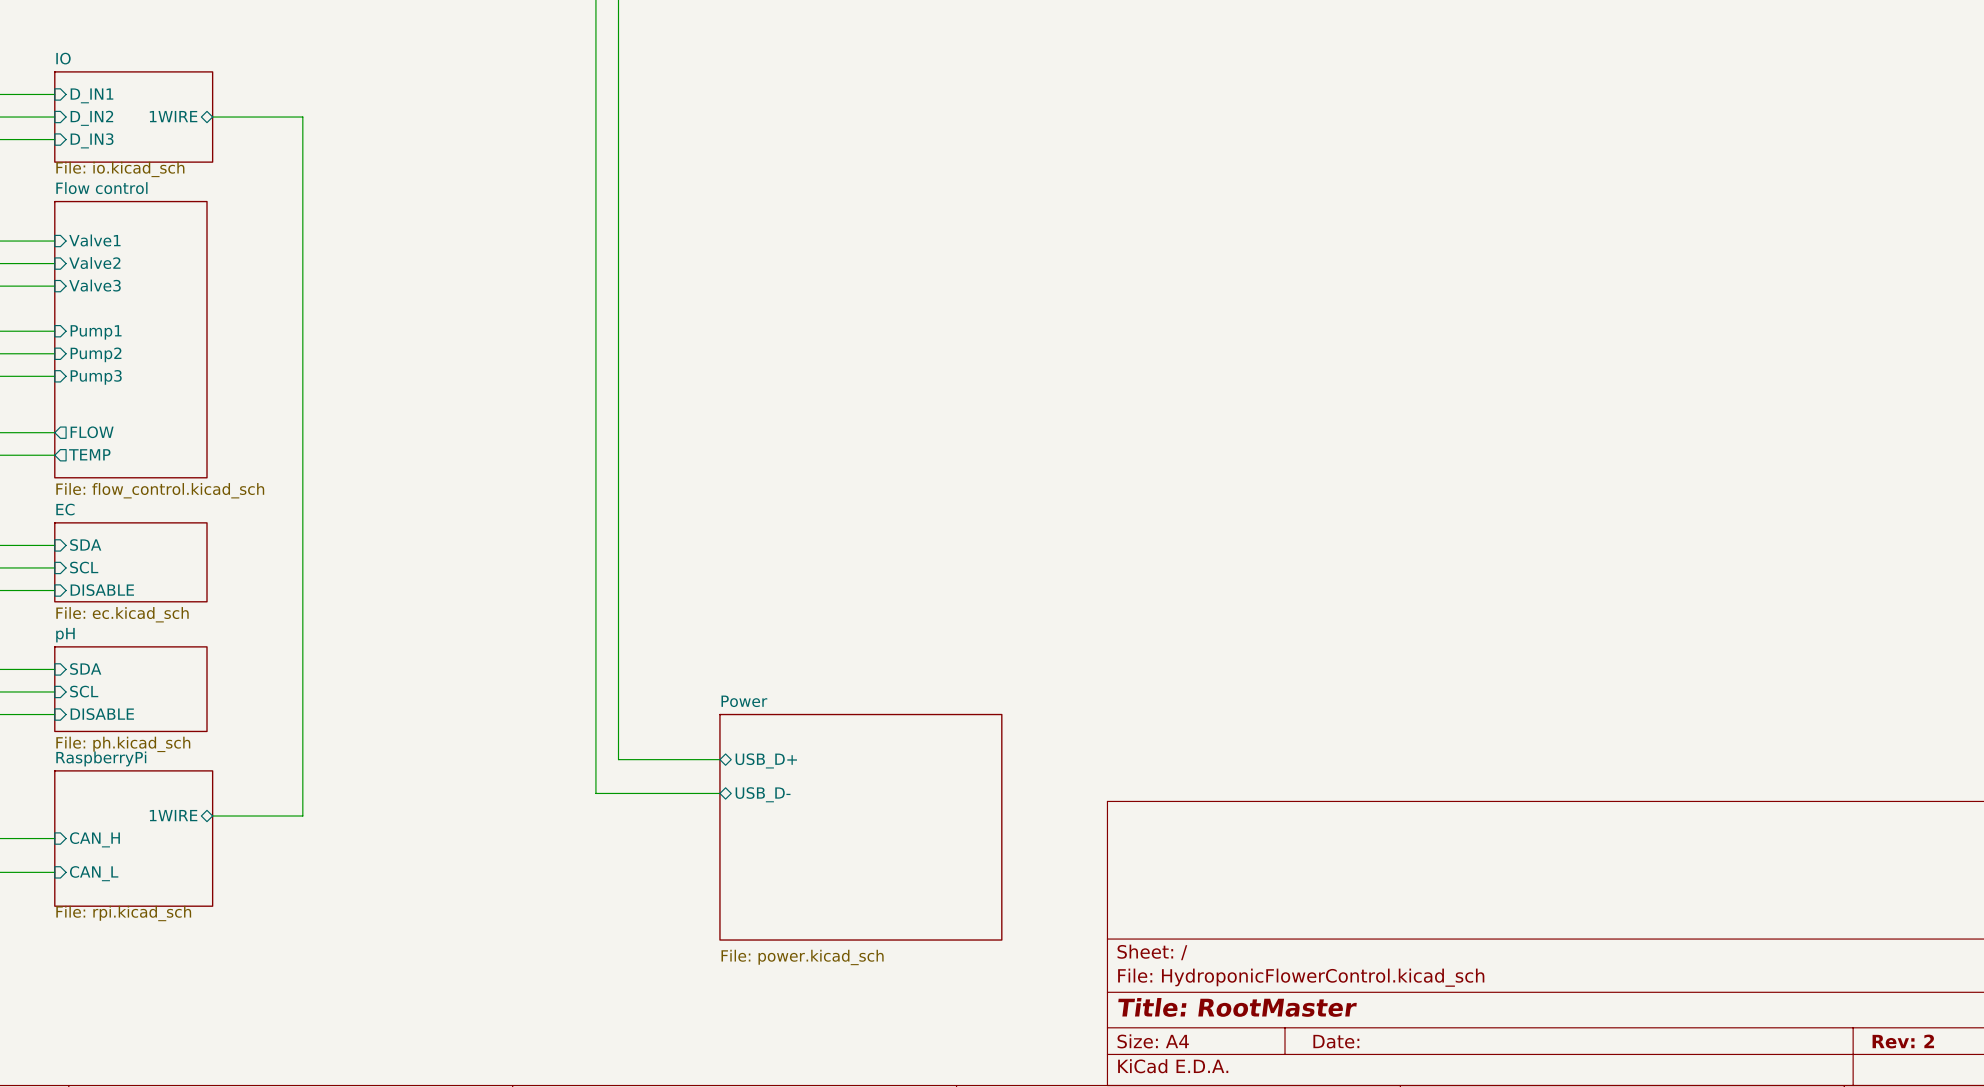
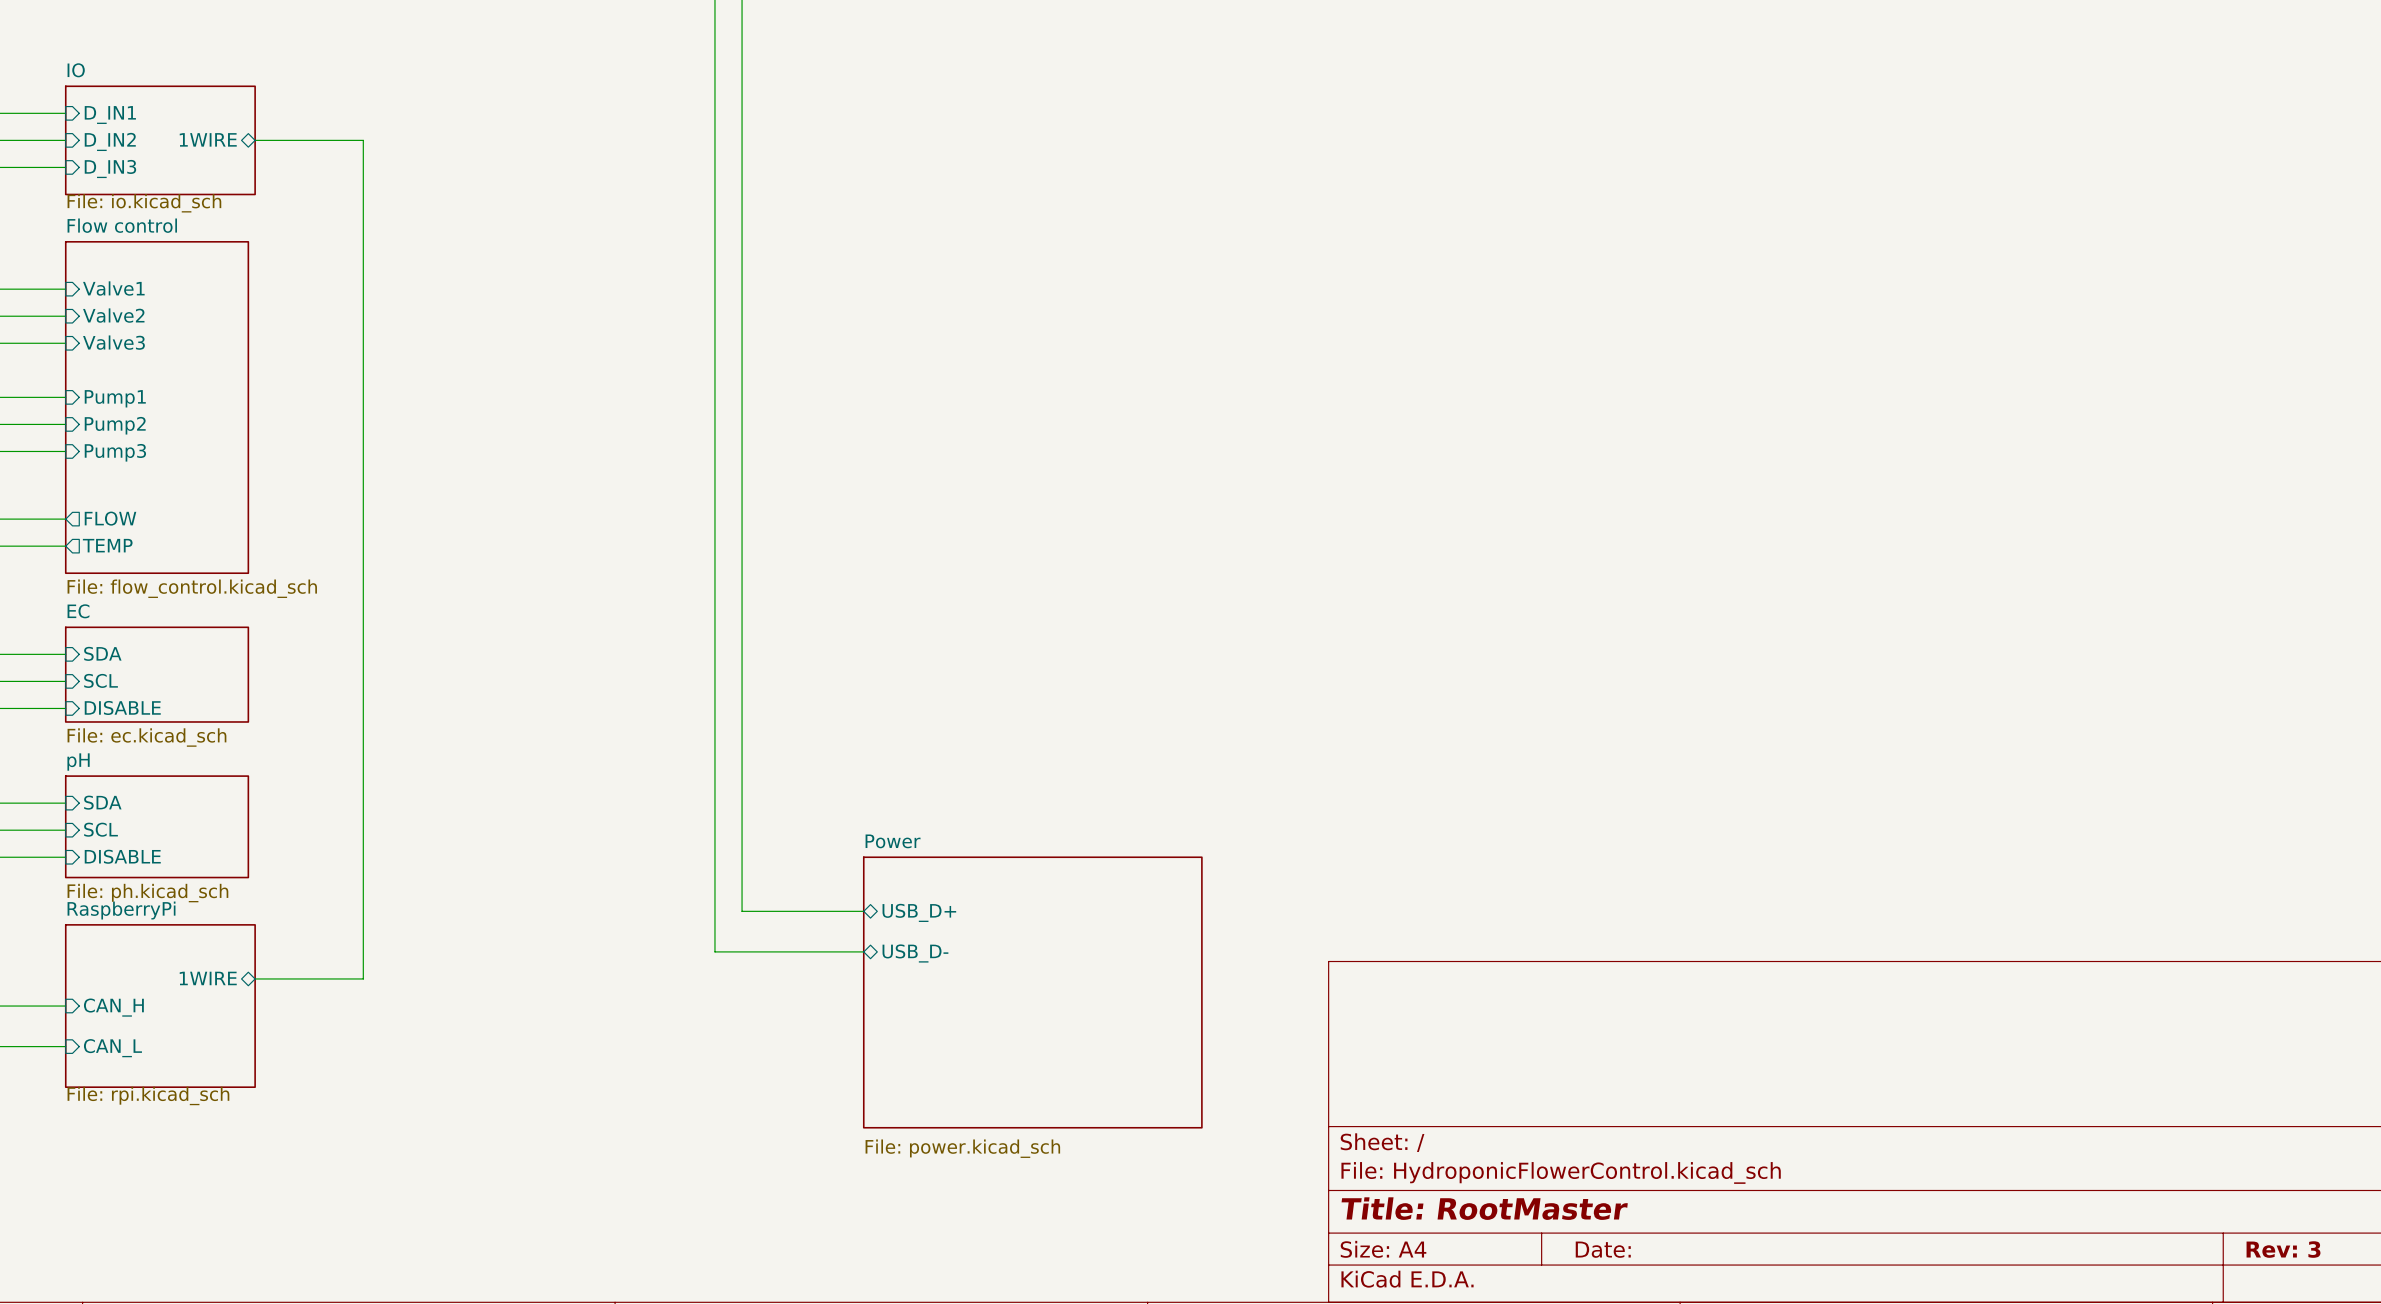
title block: Rev: 2 (1903, 1041) -> Rev: 3 (2283, 1249)

